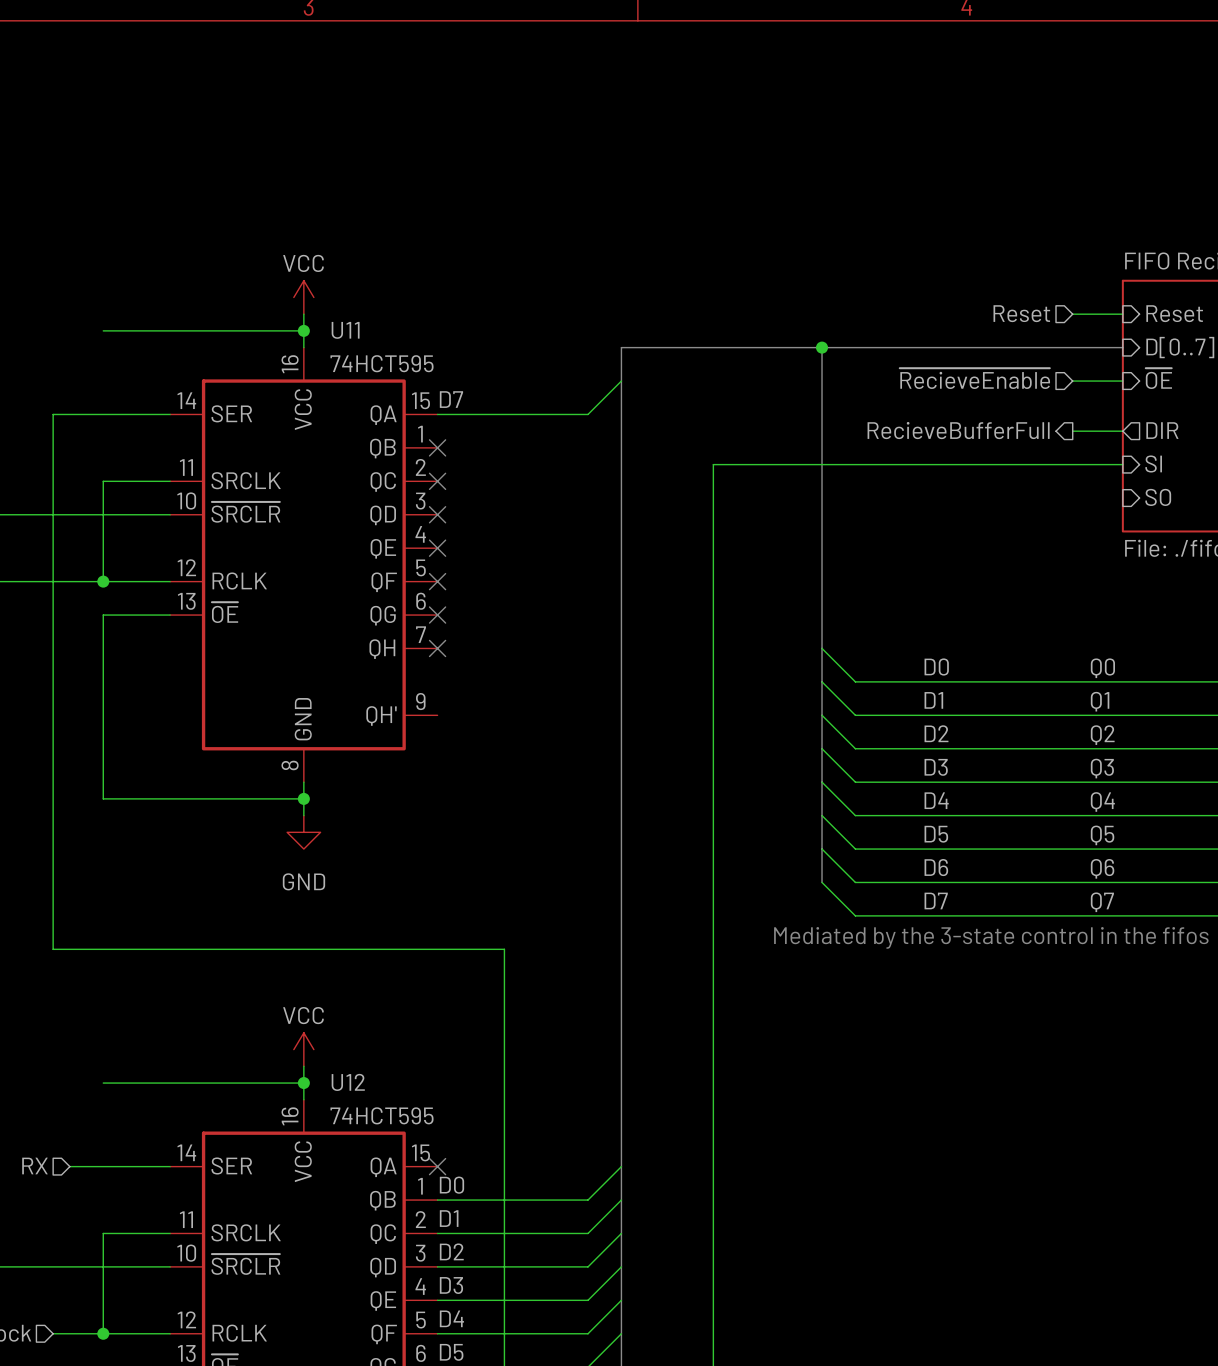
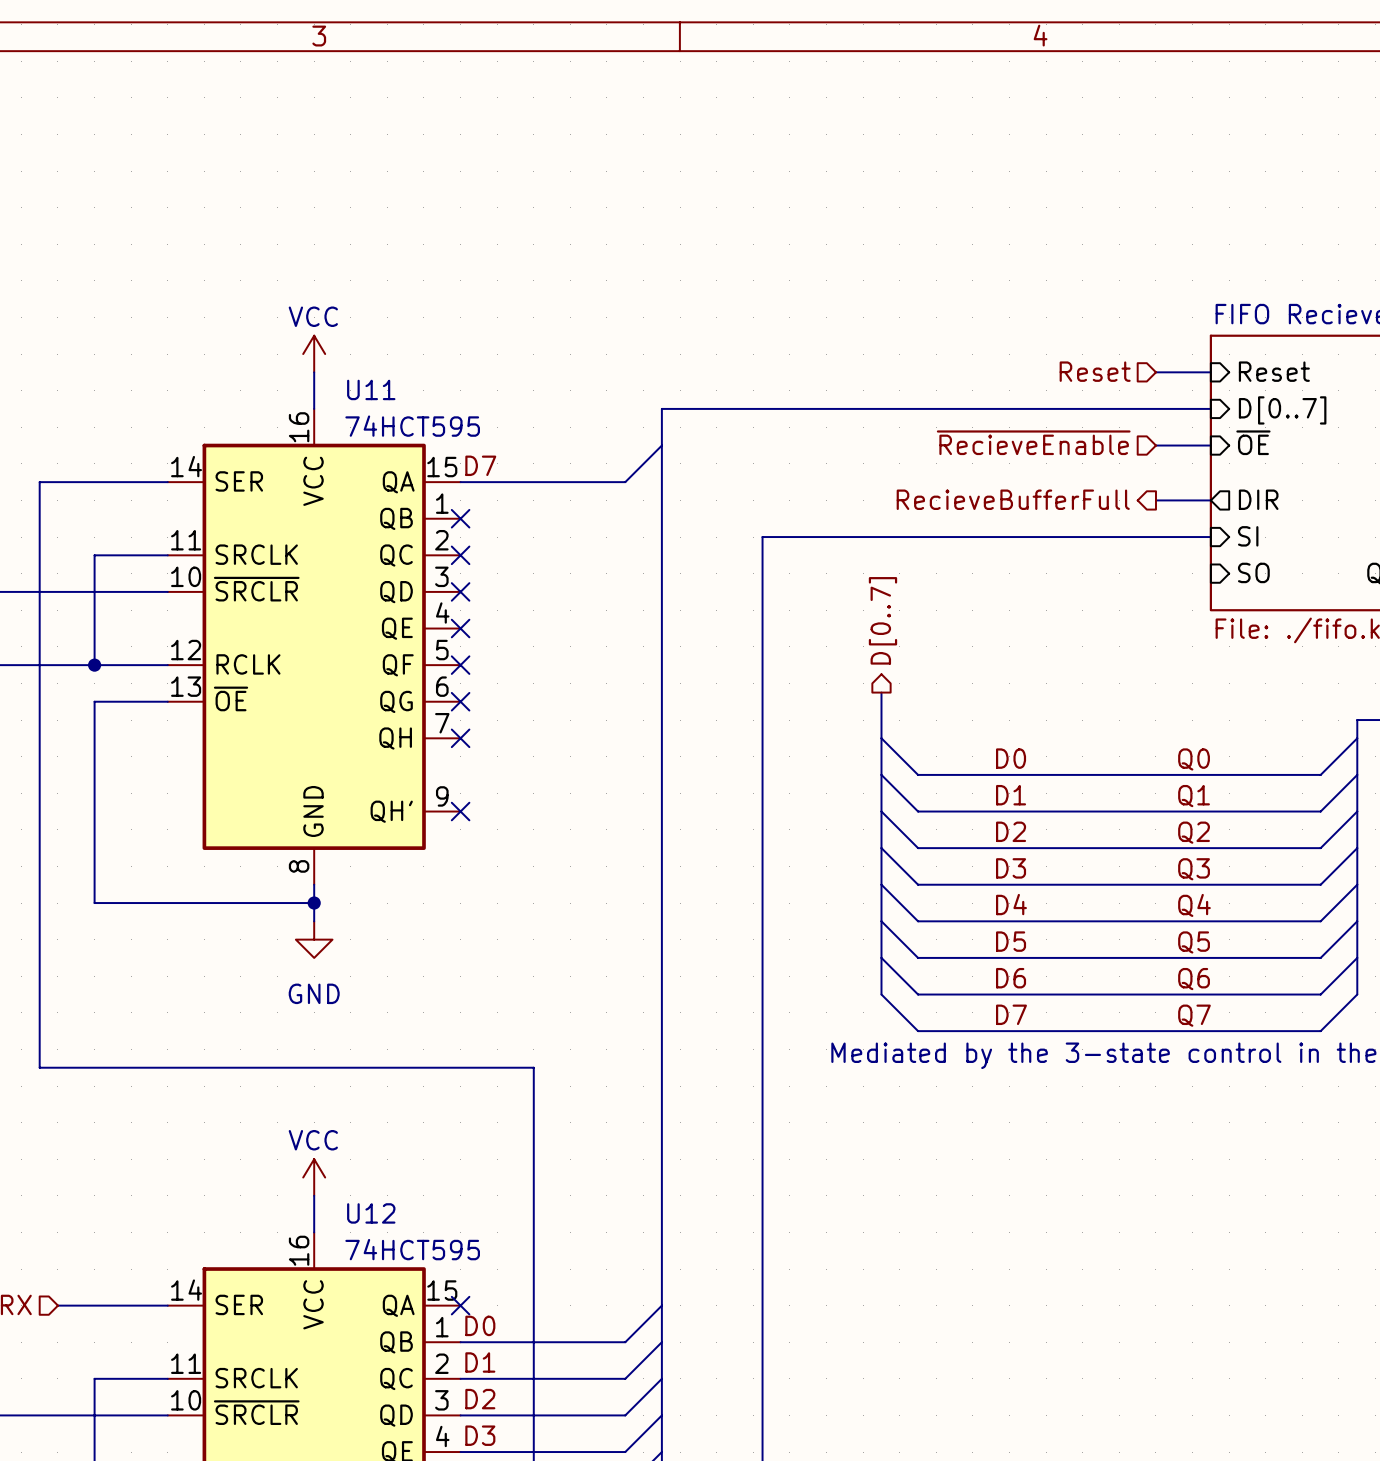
wire: (103, 330) (303, 330) -> none
junction: (303, 330) -> none
bus: (822, 347) (822, 606) -> none
junction: (822, 347) -> none
hierarchical label: none -> D[0..7] (882, 620)
no-connect mark: none -> (460, 811)
wire: (103, 1083) (303, 1083) -> none
junction: (303, 1083) -> none

